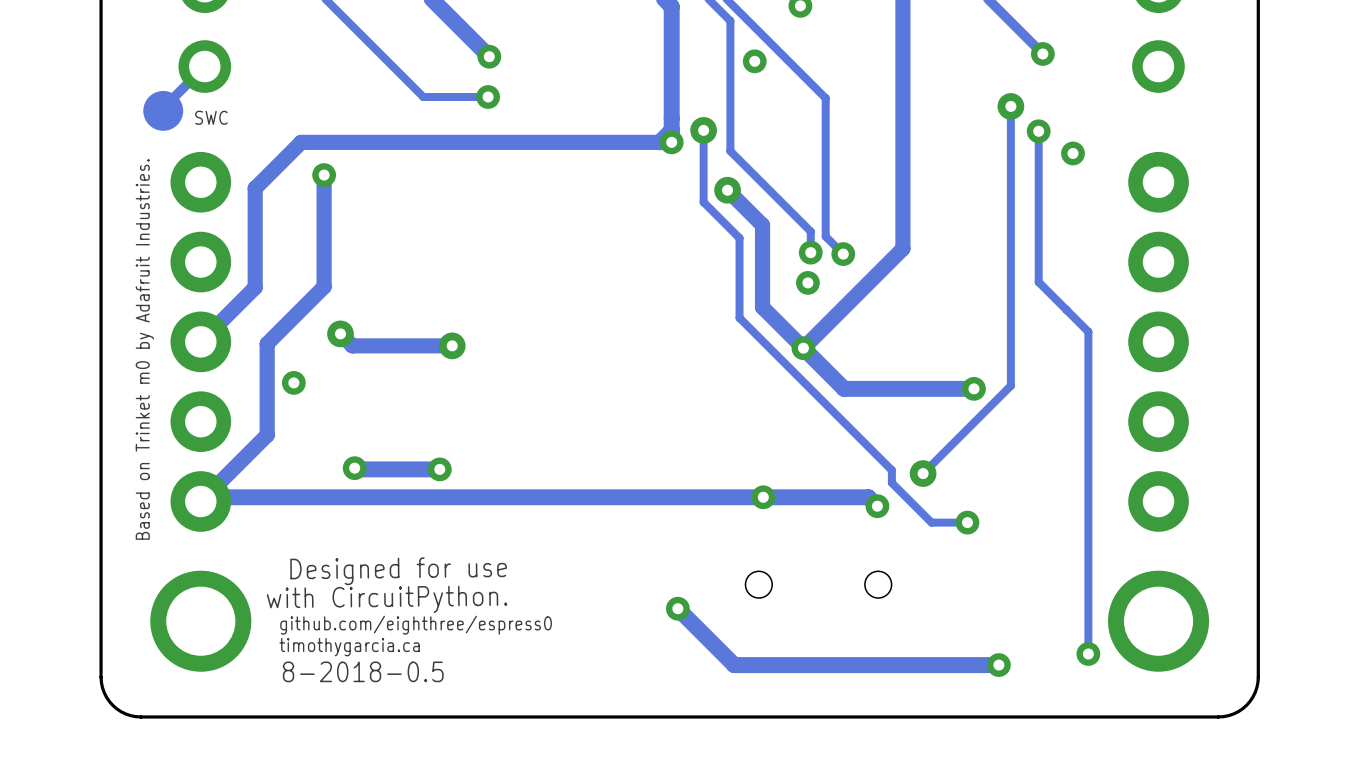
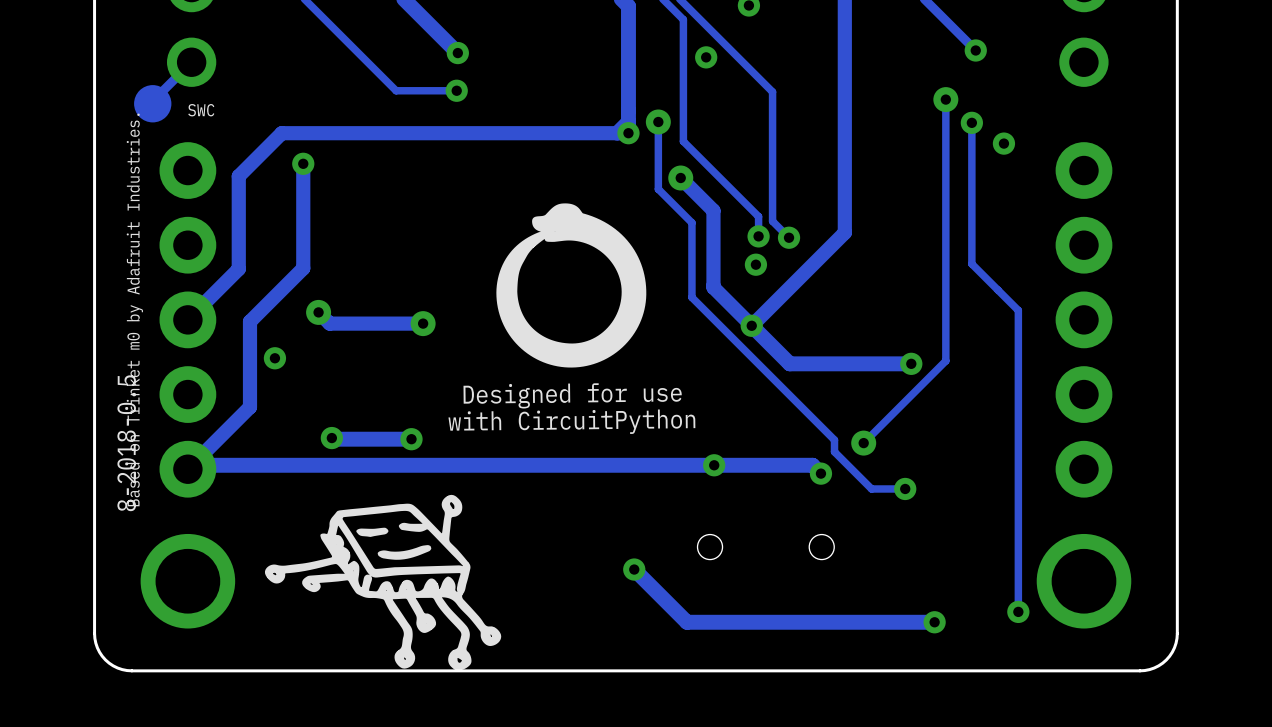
drawing: none -> [496, 203, 647, 368]
text: none -> with CircuitPython (571, 421)
drawing: none -> [264, 494, 502, 671]
text position: Designed for use (398, 571) -> Designed for use (572, 395)
text: with CircuitPython. (387, 599) -> none
text: github.com/eighthree/espress0 (416, 625) -> none
text: timothygarcia.ca (349, 647) -> none
text rotation: 0° (363, 671) -> 90° counterclockwise (126, 443)
text position: 8-2018-0.5 (363, 671) -> 8-2018-0.5 (126, 443)

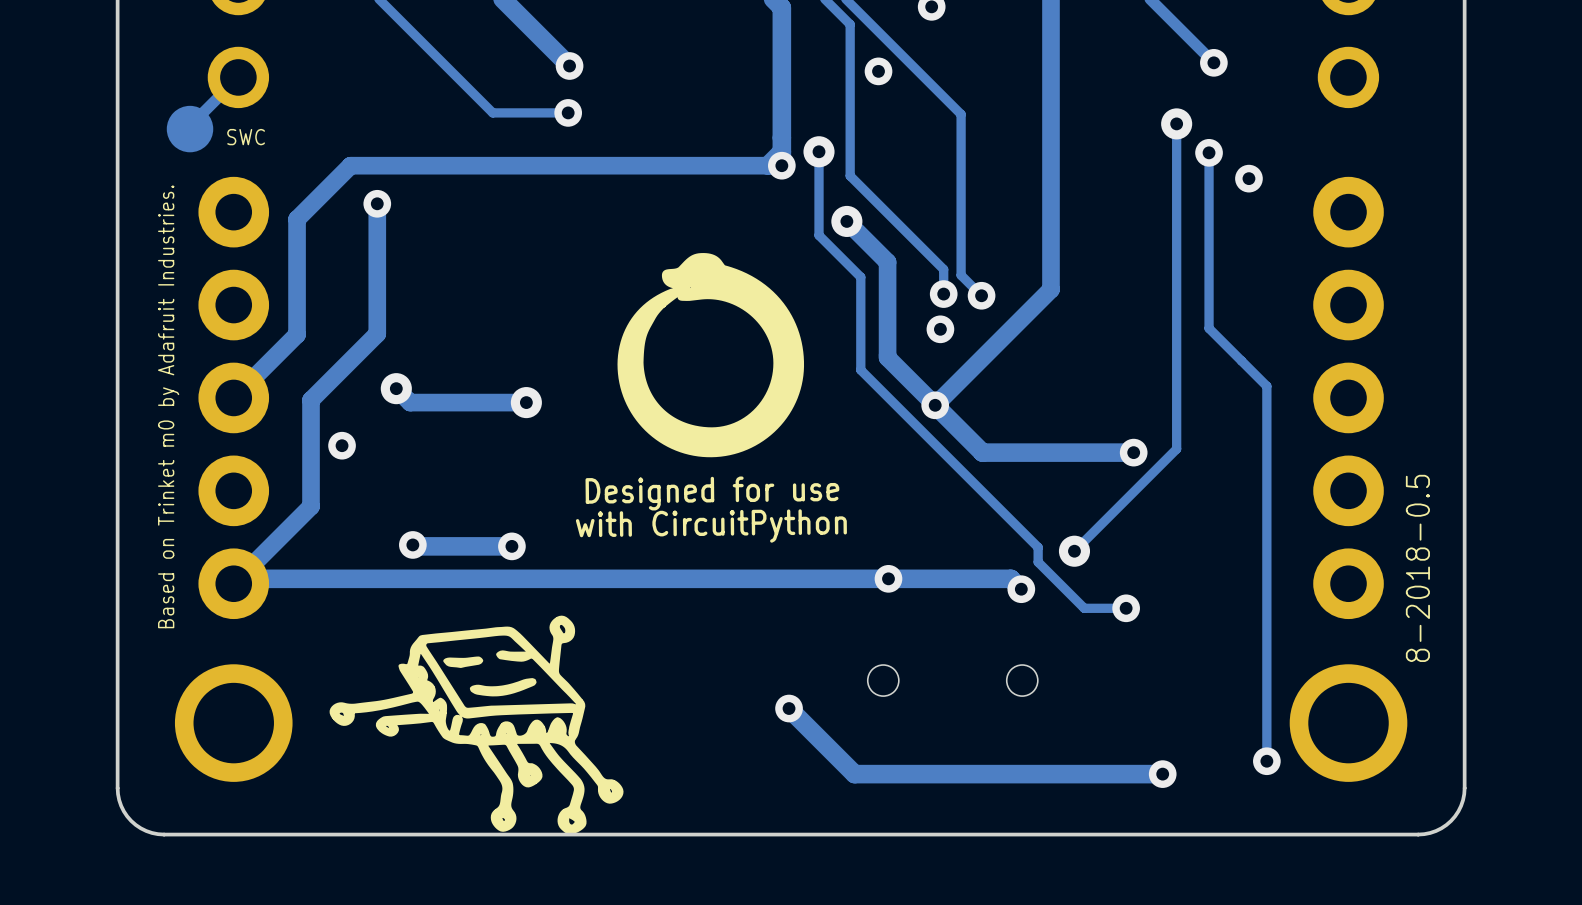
text: 8-2018-0.5 (126, 443) -> none
text: none -> 8-2018-0.5 (1417, 568)

